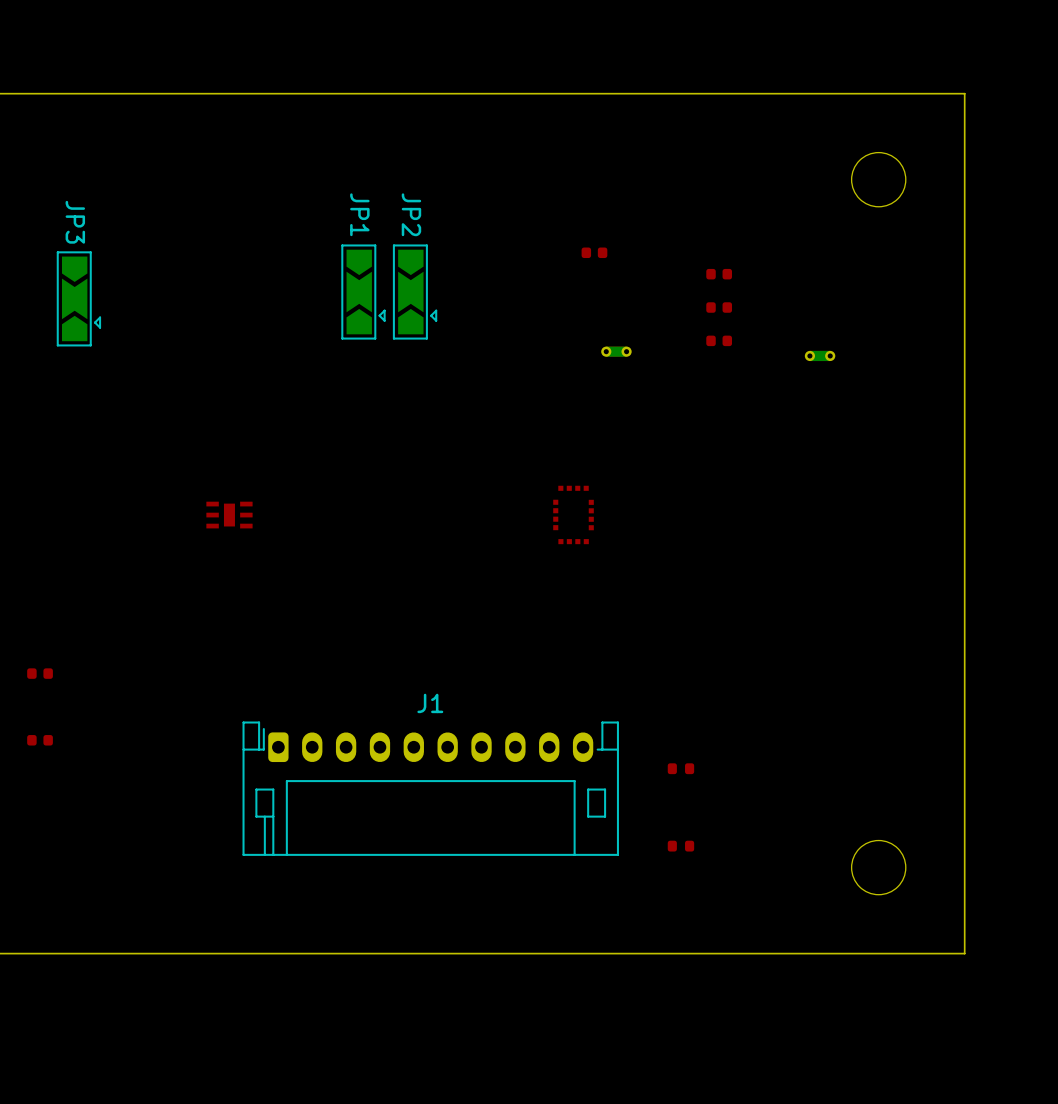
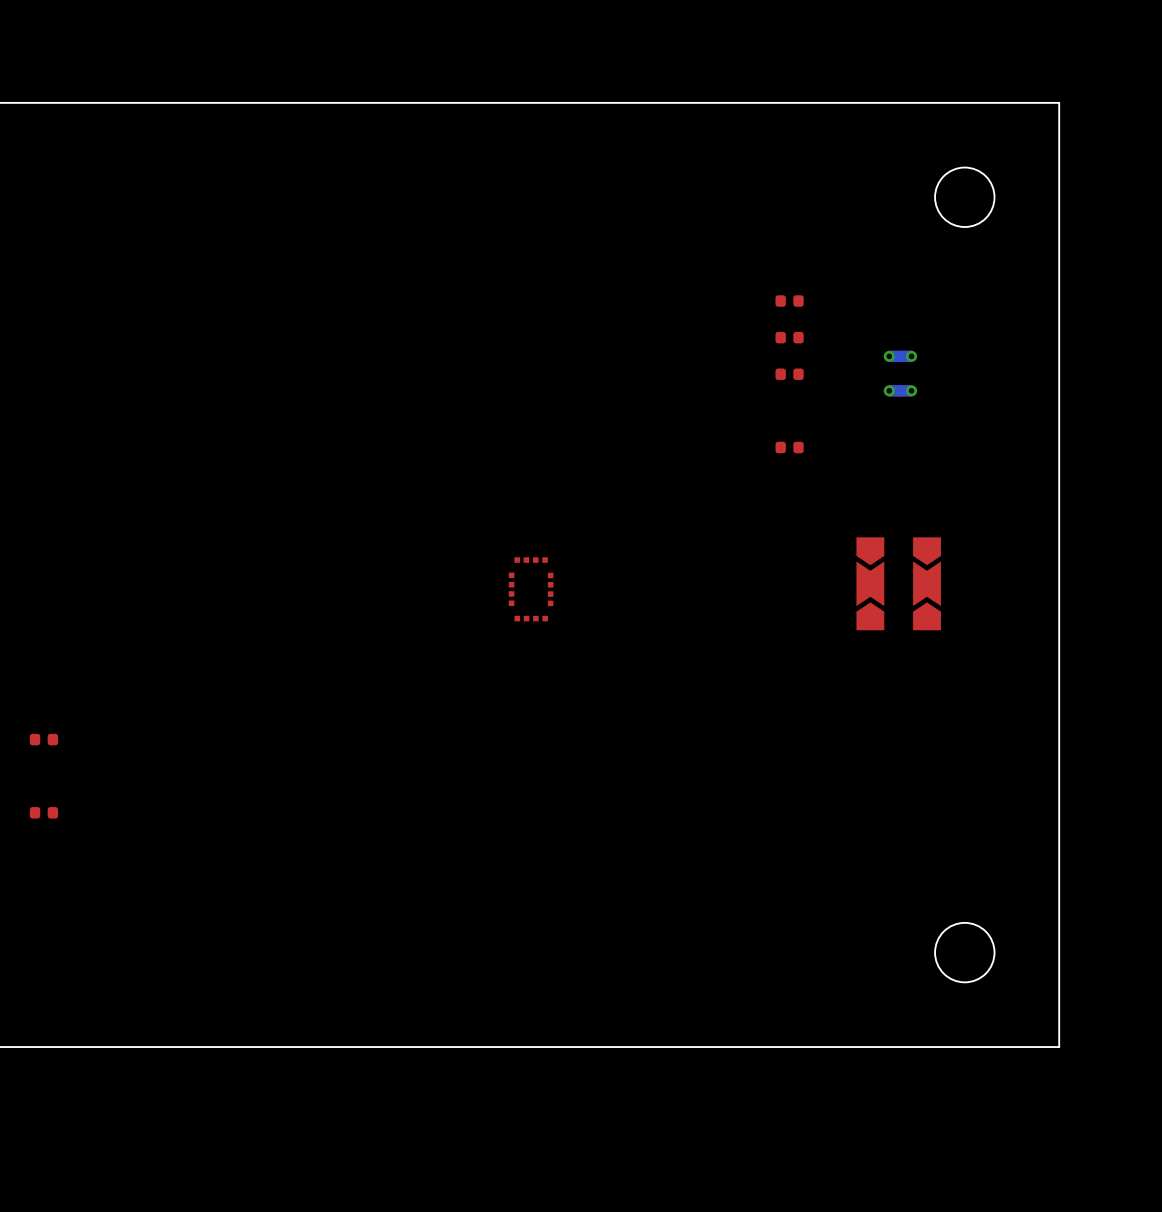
part position: (594, 252) -> (789, 447)
JP1: (363, 292) -> none
JP2: (415, 292) -> none
JP3: (78, 298) -> none
part position: (616, 351) -> (900, 356)
part position: (573, 514) -> (531, 589)
part: (229, 515) -> none
part: none -> (870, 583)
part: none -> (927, 583)
part: (680, 768) -> none
J1: (430, 788) -> none
part: (680, 846) -> none

